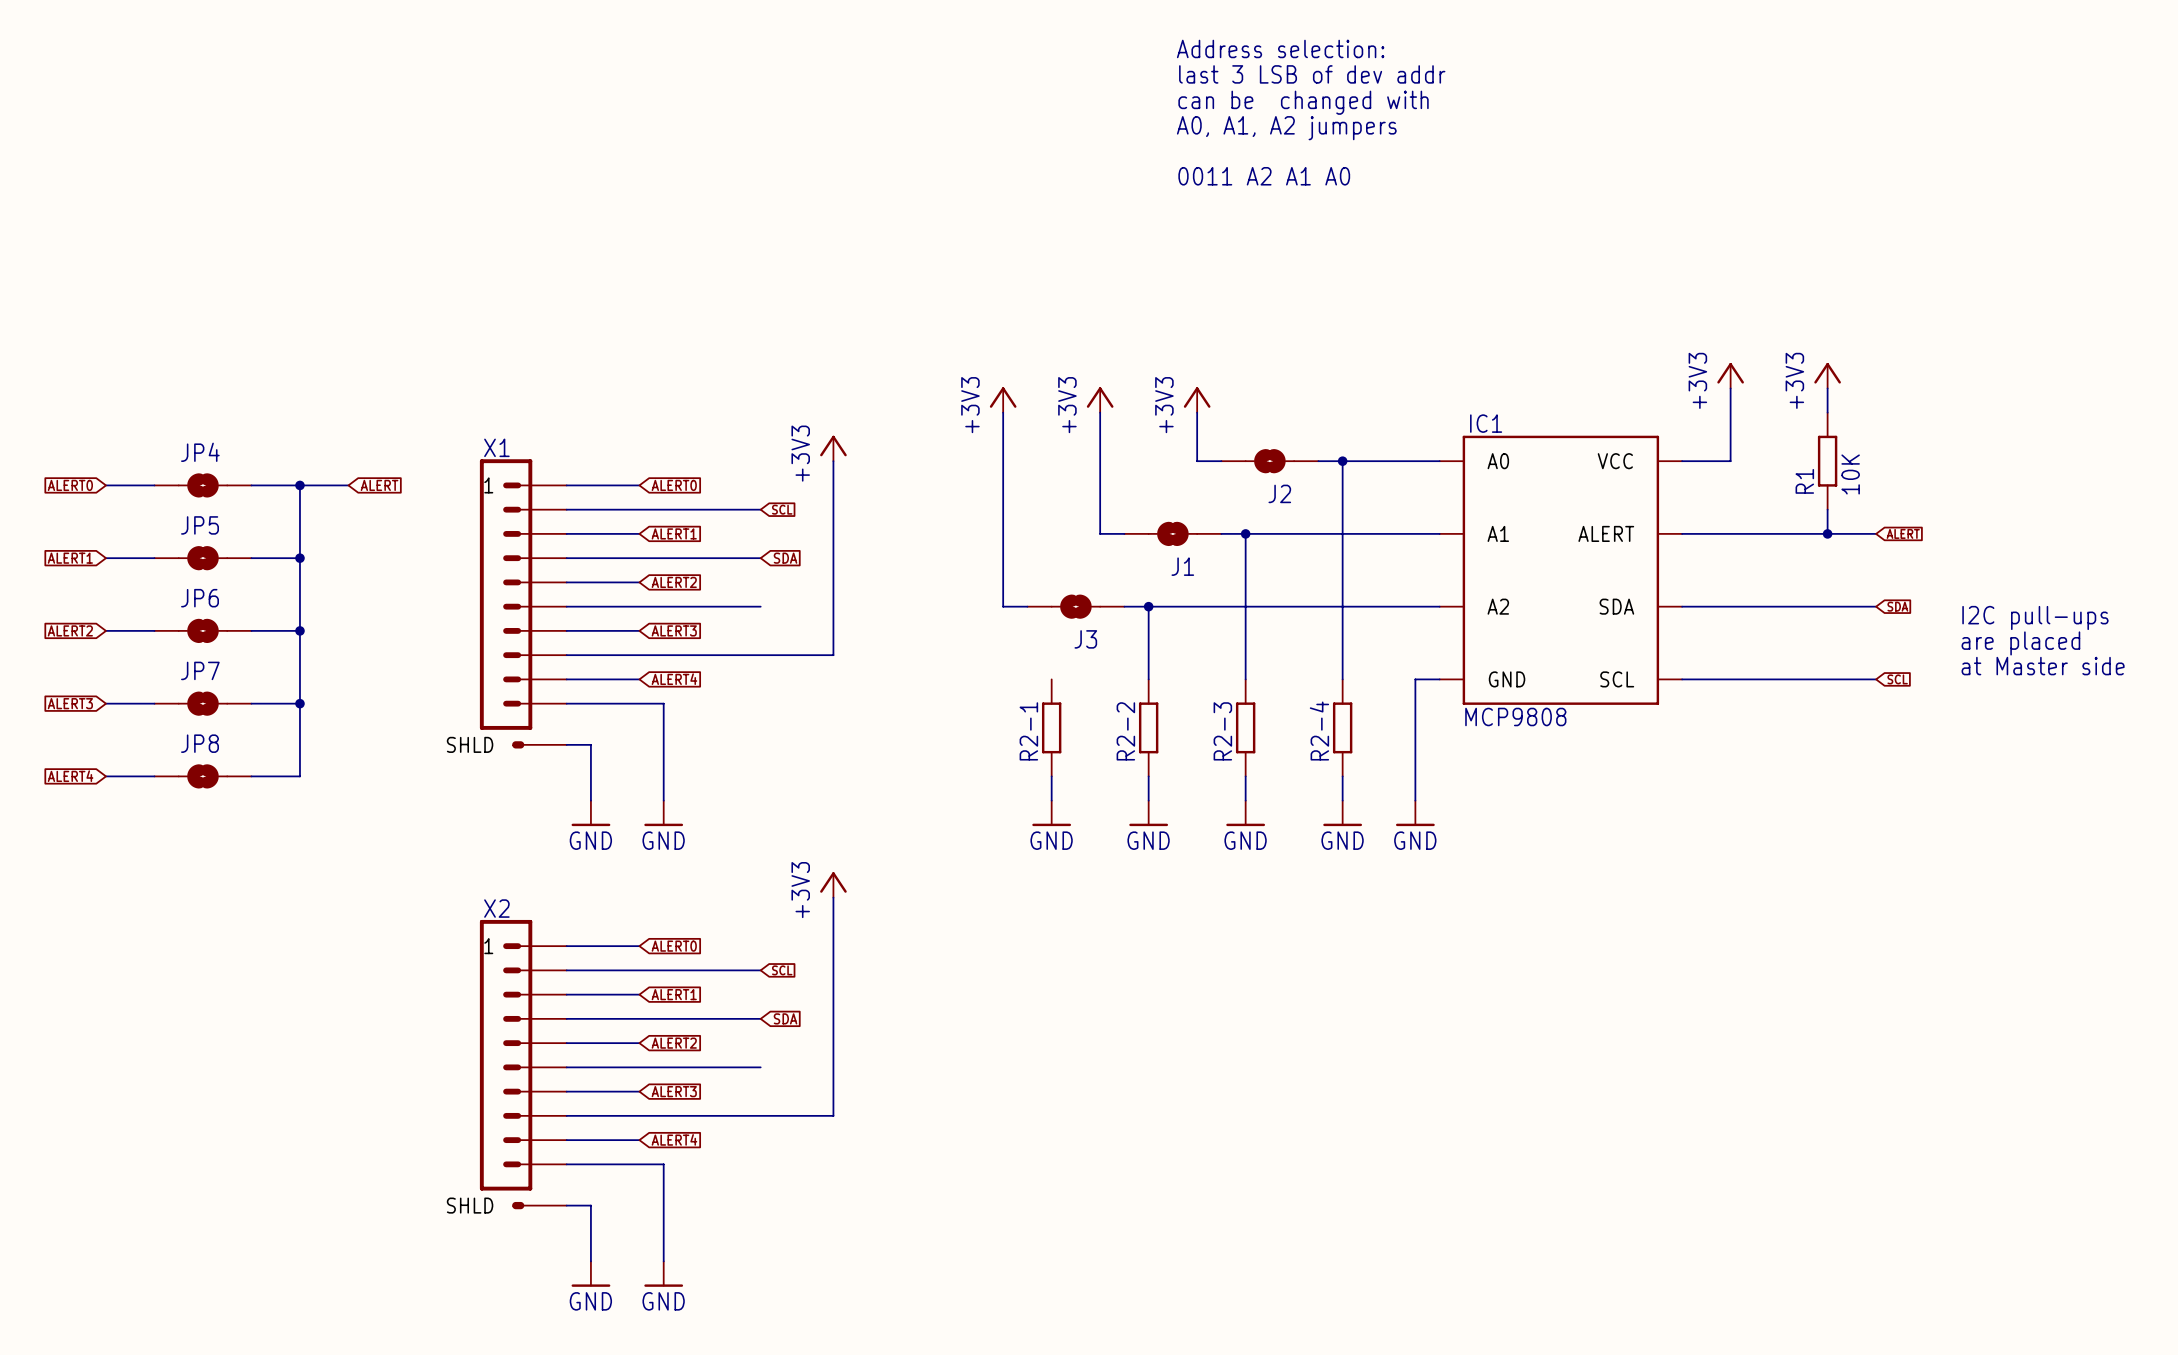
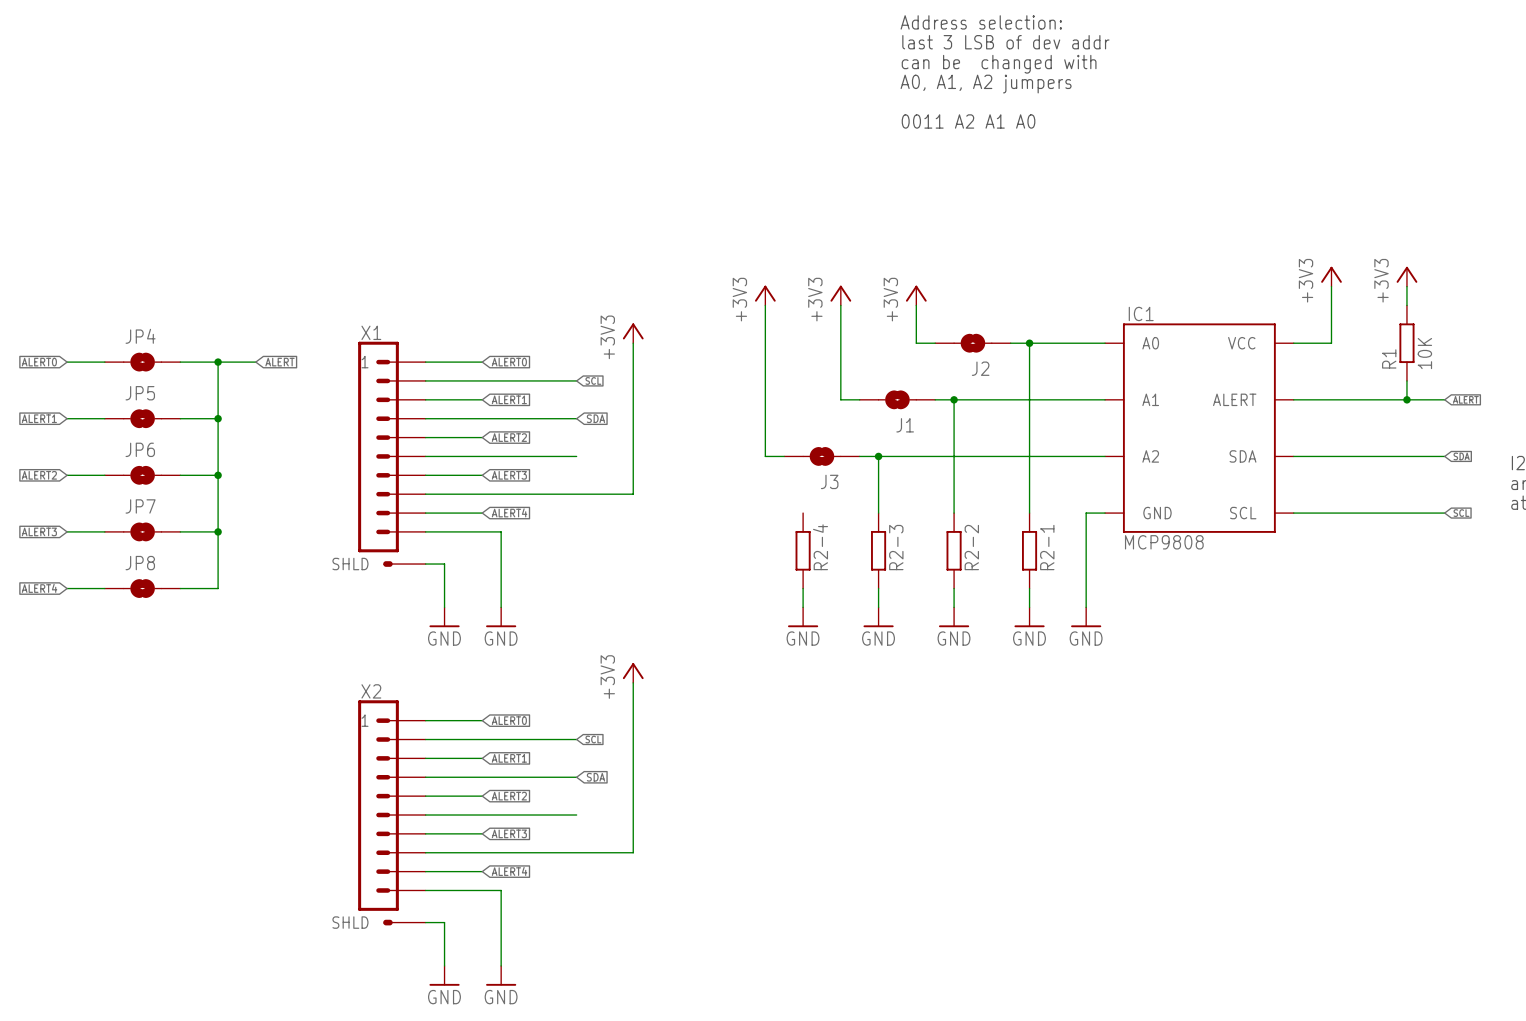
R2-1 name: R2-1 (1028, 731) -> R2-4 (820, 547)
R2-2 name: R2-2 (1125, 731) -> R2-3 (896, 547)
R2-3 name: R2-3 (1222, 731) -> R2-2 (971, 547)
R2-4 name: R2-4 (1319, 731) -> R2-1 (1047, 547)

